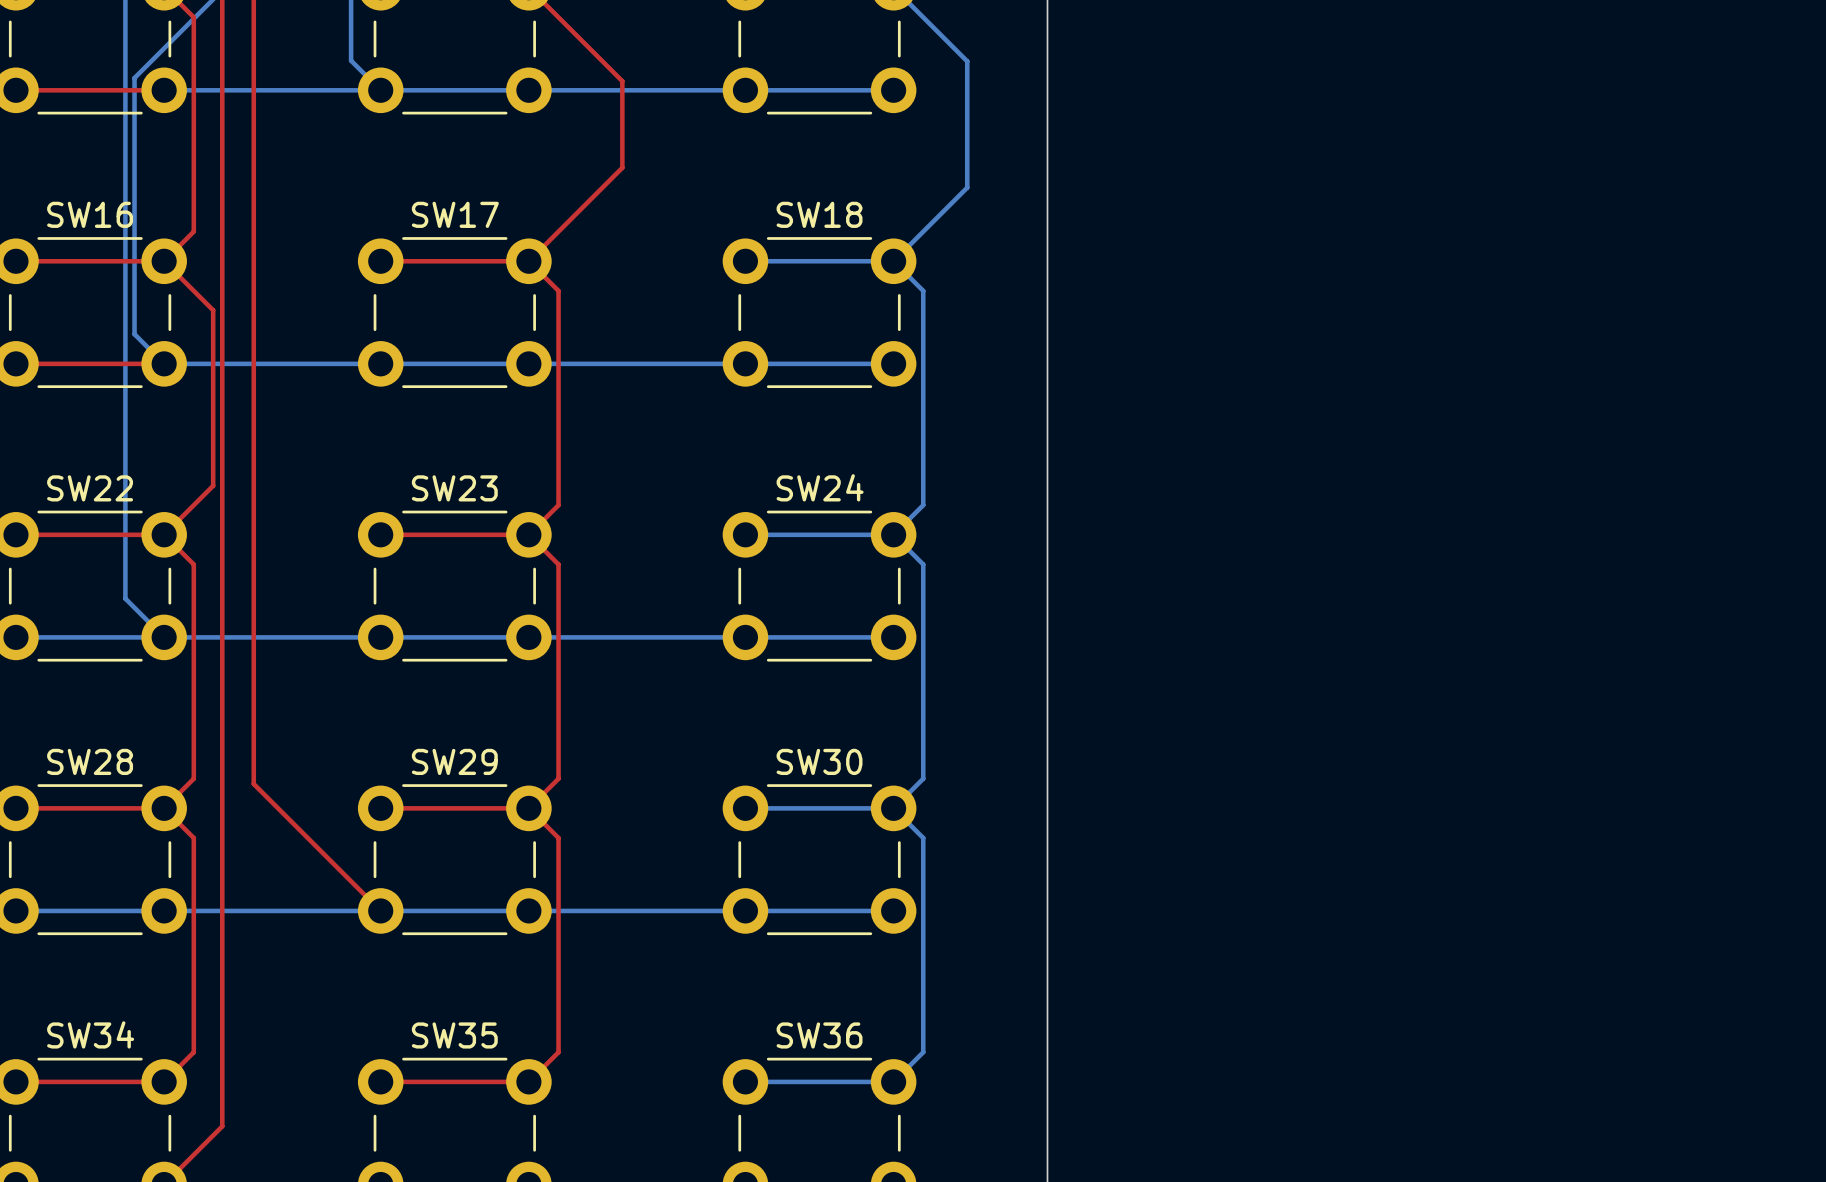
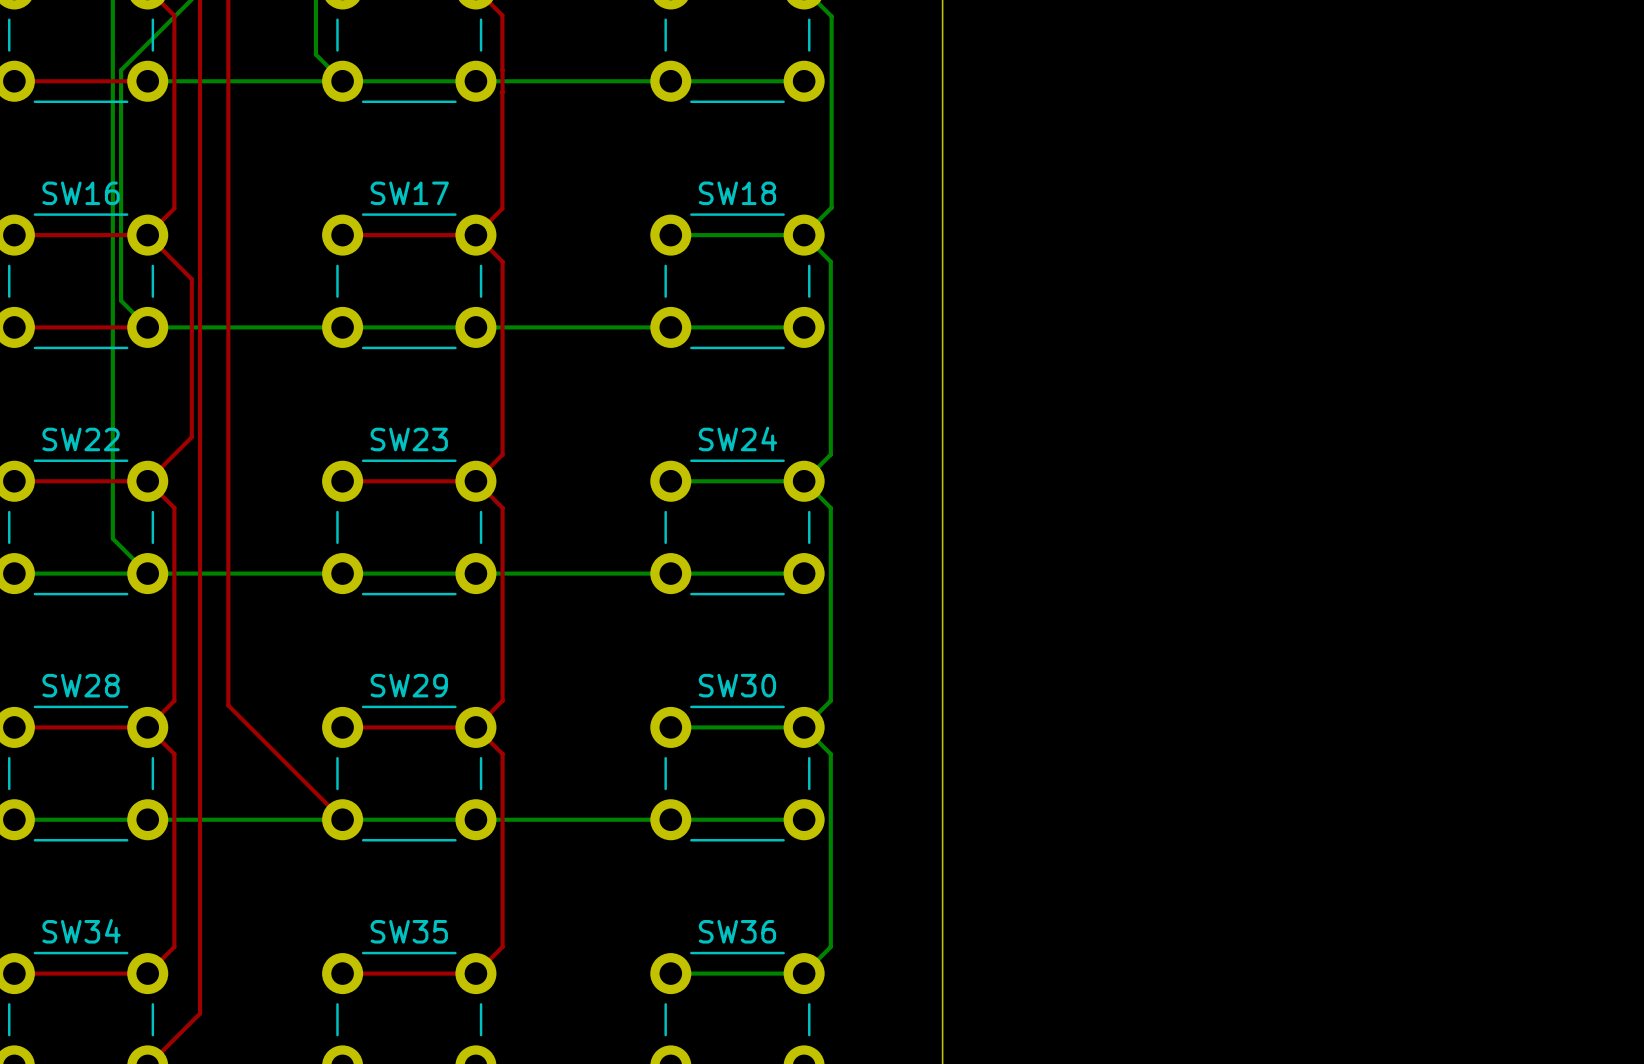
top track: (558, 17) (622, 81) (622, 167) (558, 231) -> (502, 92) (502, 208)
top track: none -> (502, 15) (502, 70)
bottom track: (924, 18) (967, 61) (967, 187) (924, 230) -> (831, 16) (831, 207)
top track: none -> (502, 70) (502, 92)

